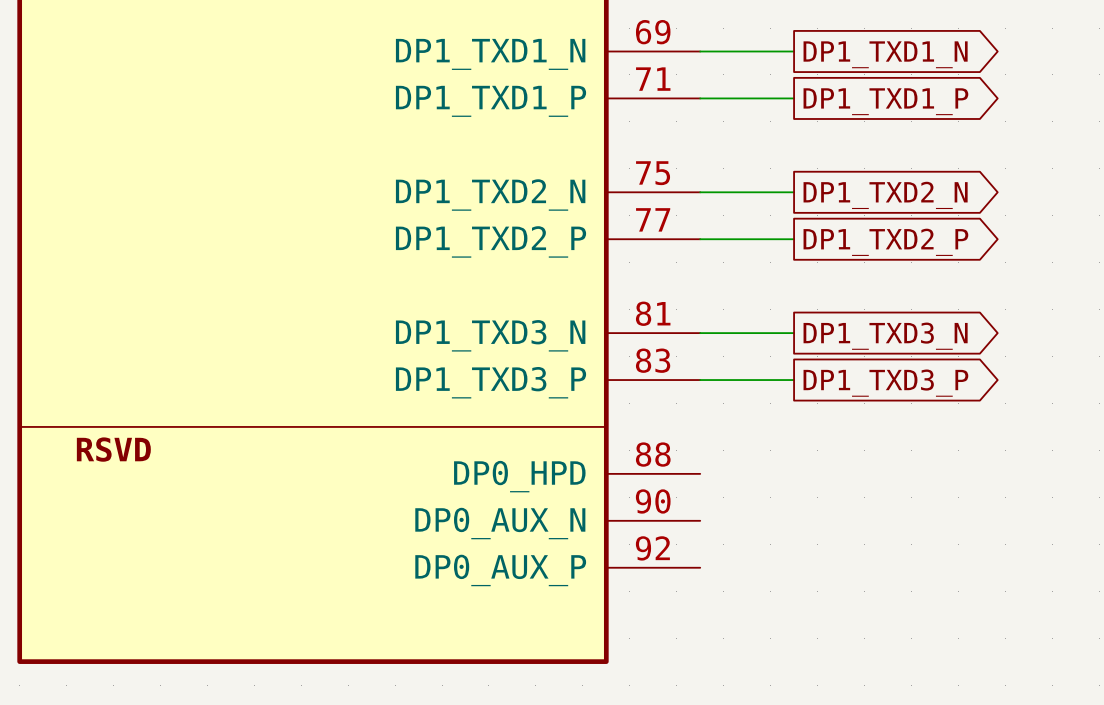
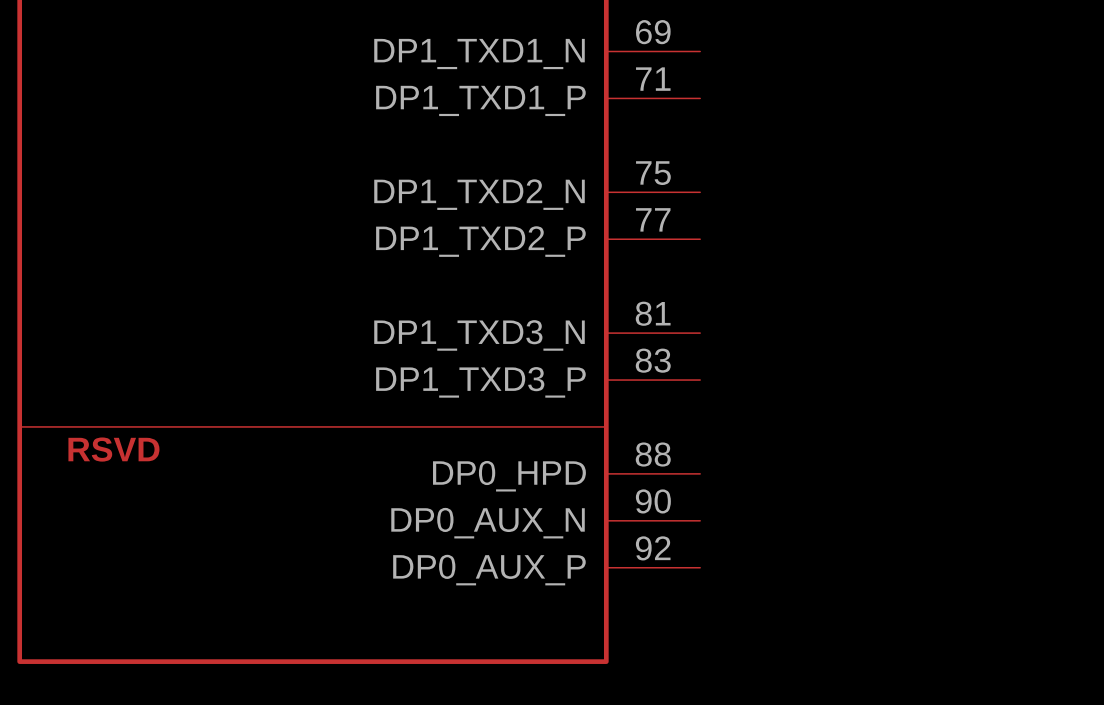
wire: (700, 51) (794, 51) -> none
global label: DP1_TXD1_N (885, 54) -> none
wire: (700, 98) (794, 98) -> none
global label: DP1_TXD1_P (885, 101) -> none
wire: (700, 192) (794, 192) -> none
global label: DP1_TXD2_N (885, 195) -> none
wire: (700, 239) (794, 239) -> none
global label: DP1_TXD2_P (885, 242) -> none
wire: (700, 333) (794, 333) -> none
global label: DP1_TXD3_N (885, 336) -> none
wire: (700, 380) (794, 380) -> none
global label: DP1_TXD3_P (885, 383) -> none

